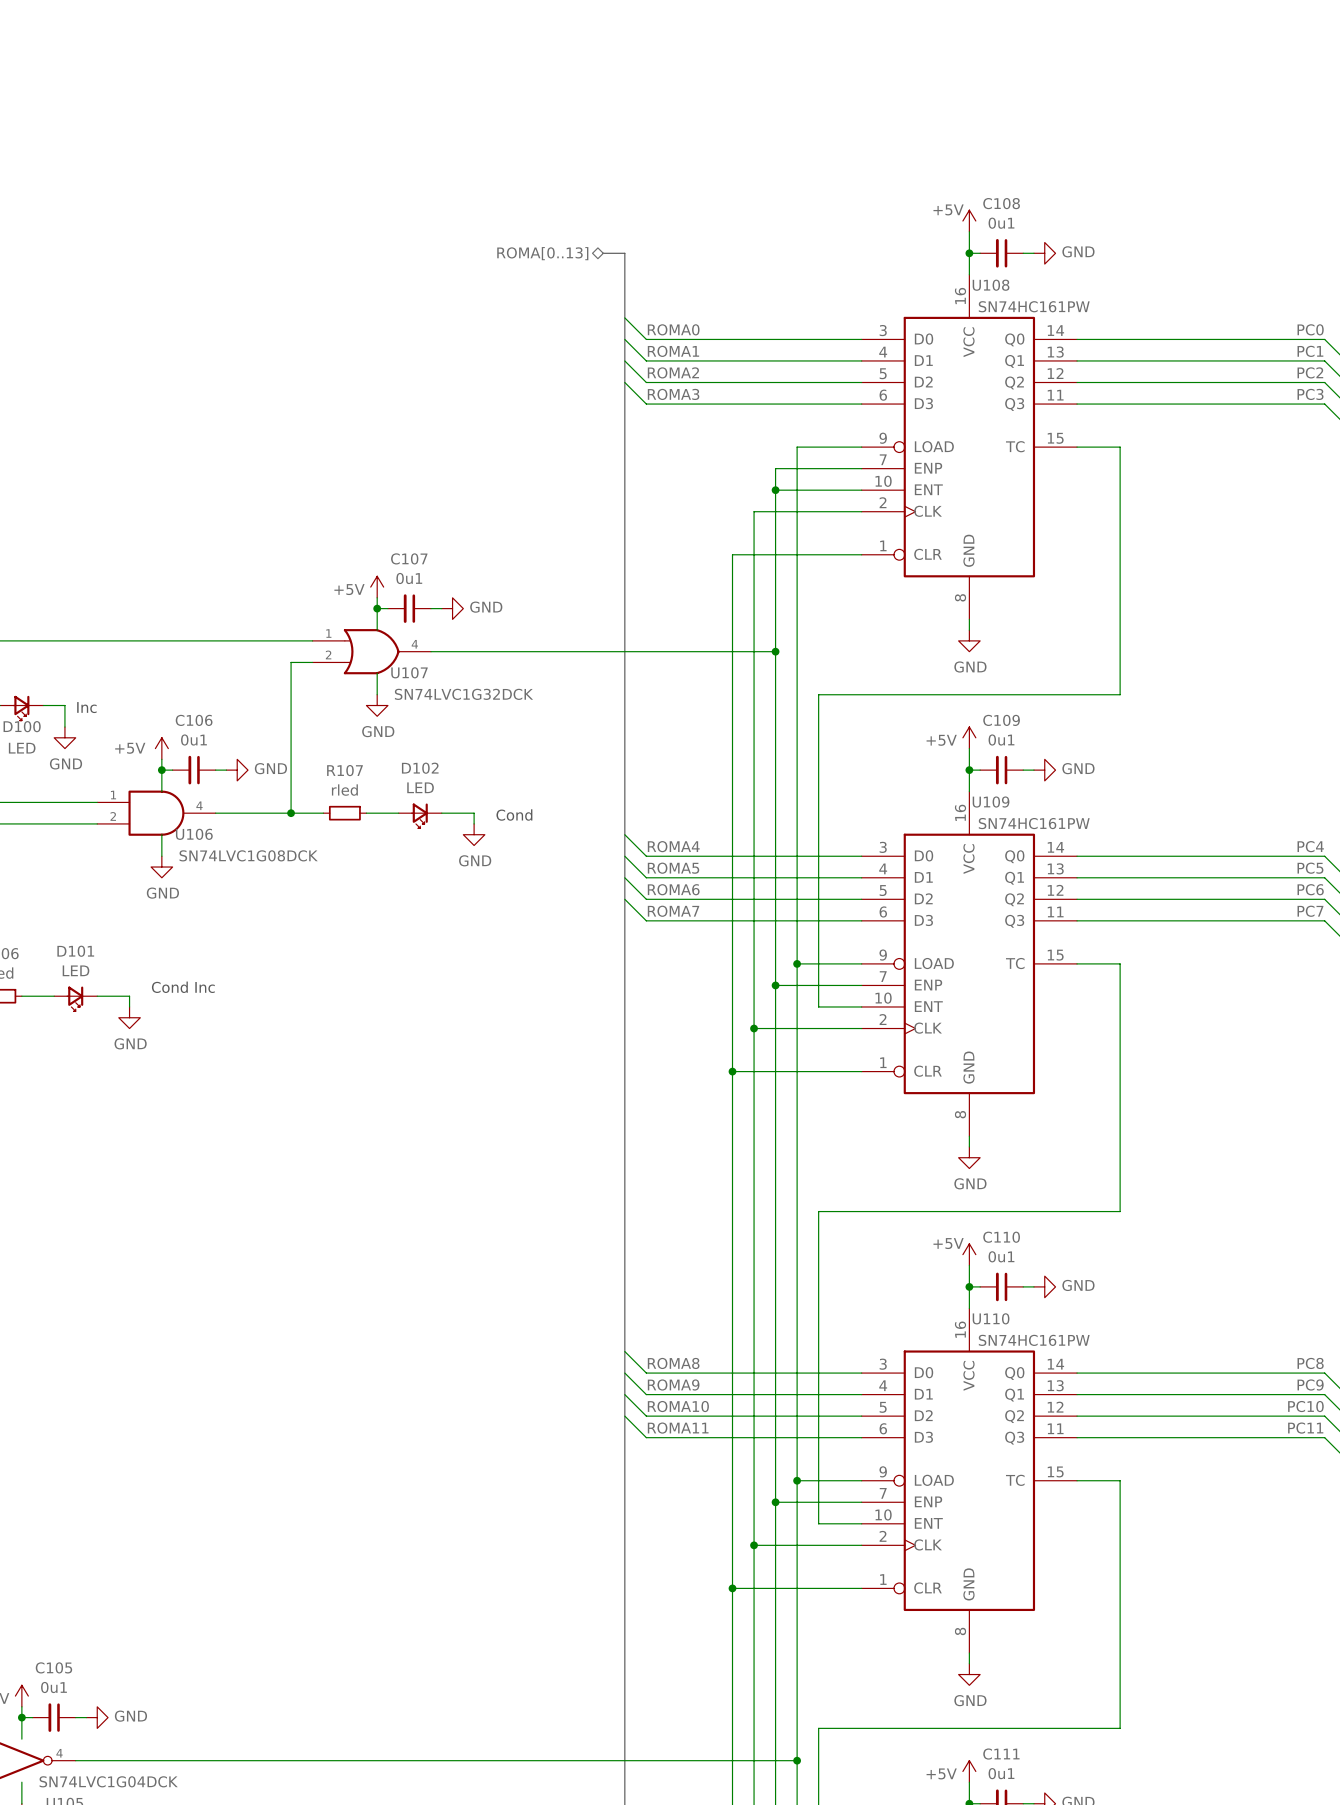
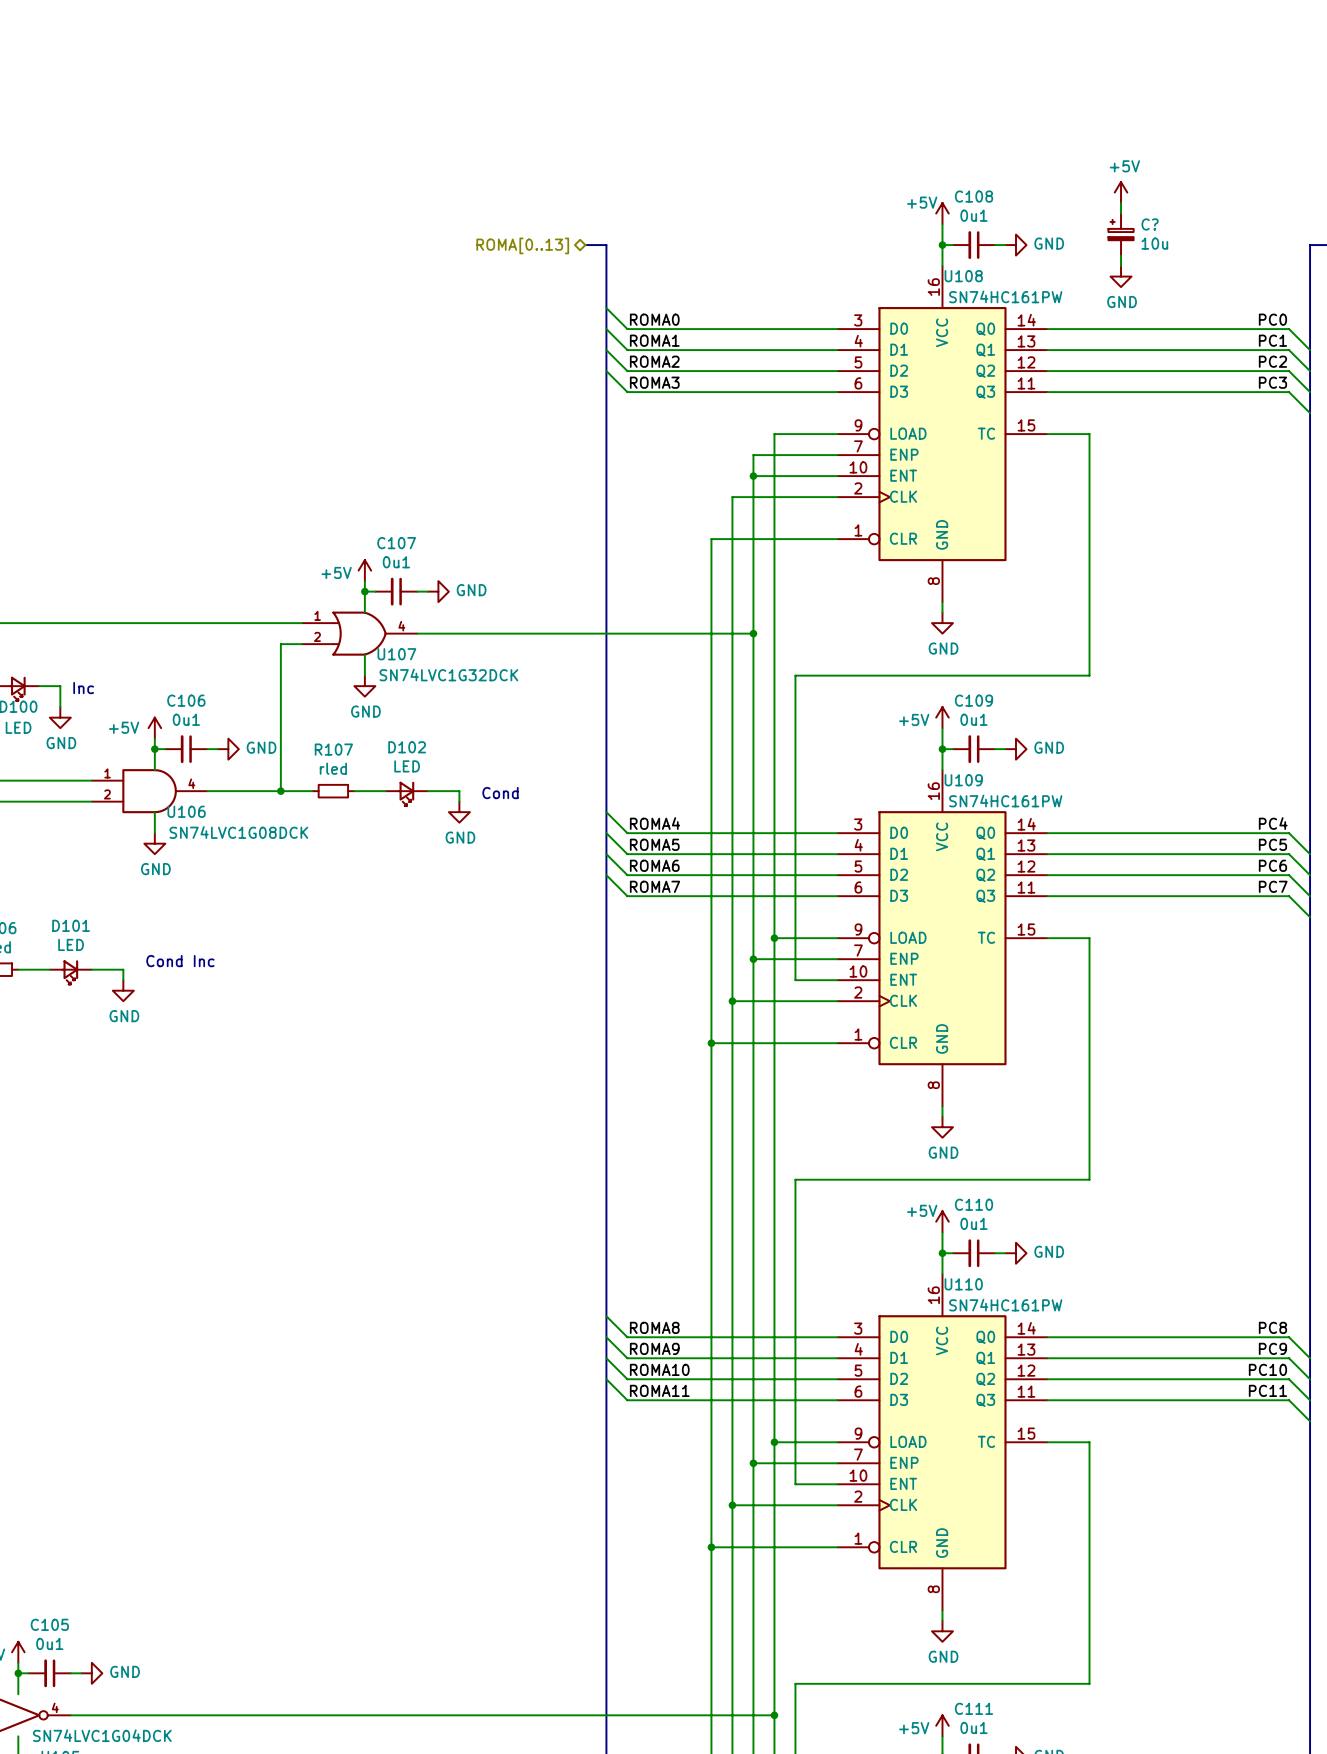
power symbol: none -> +5V (1121, 192)
wire: none -> (1121, 203) (1121, 213)
C?: none -> 10u (1121, 234)
wire: none -> (1121, 255) (1121, 266)
power symbol: none -> GND (1121, 276)

